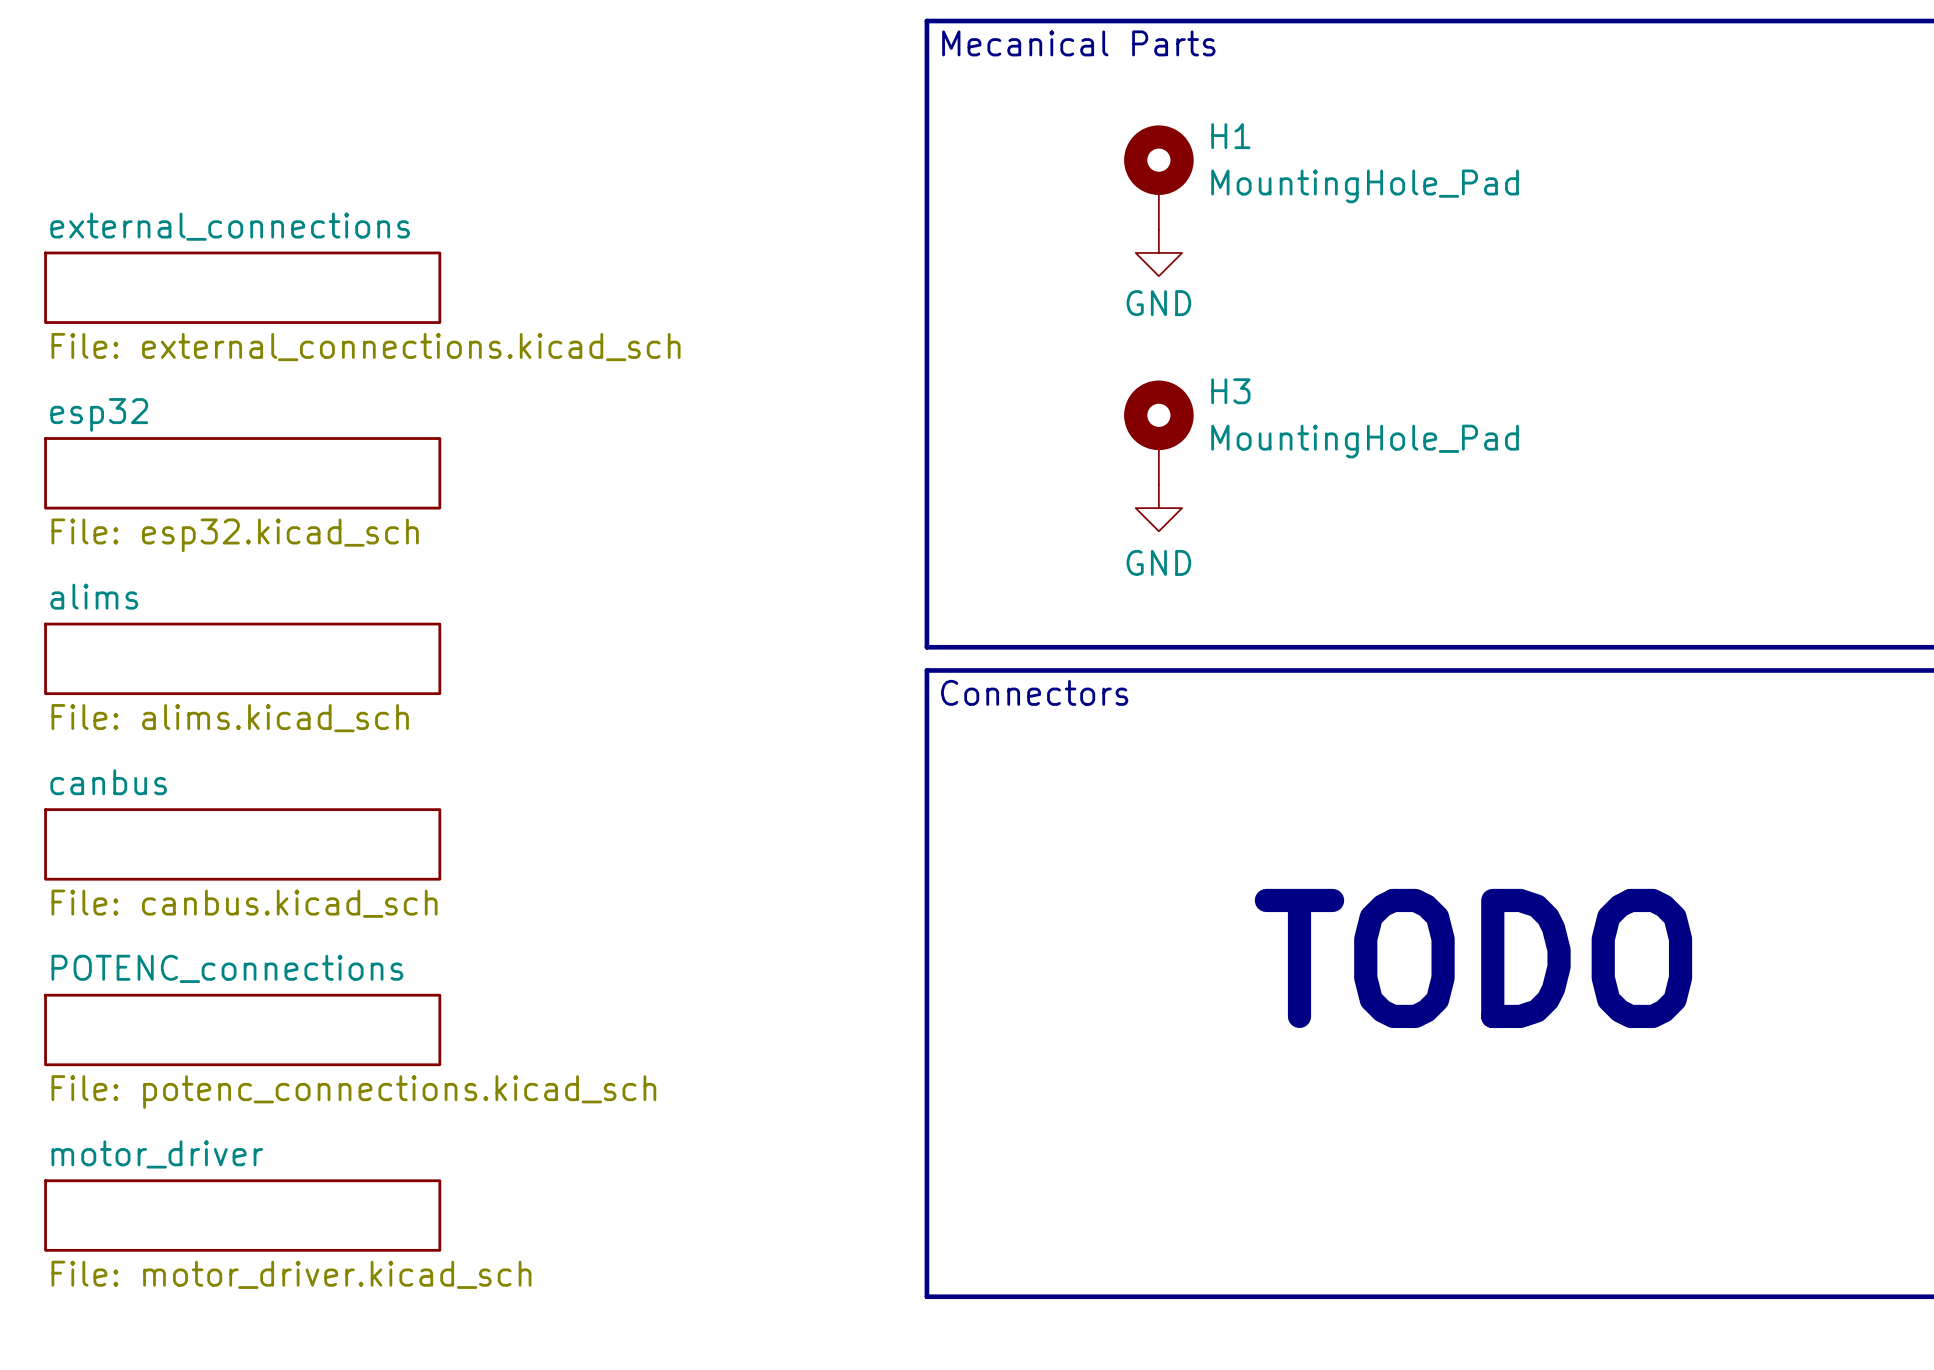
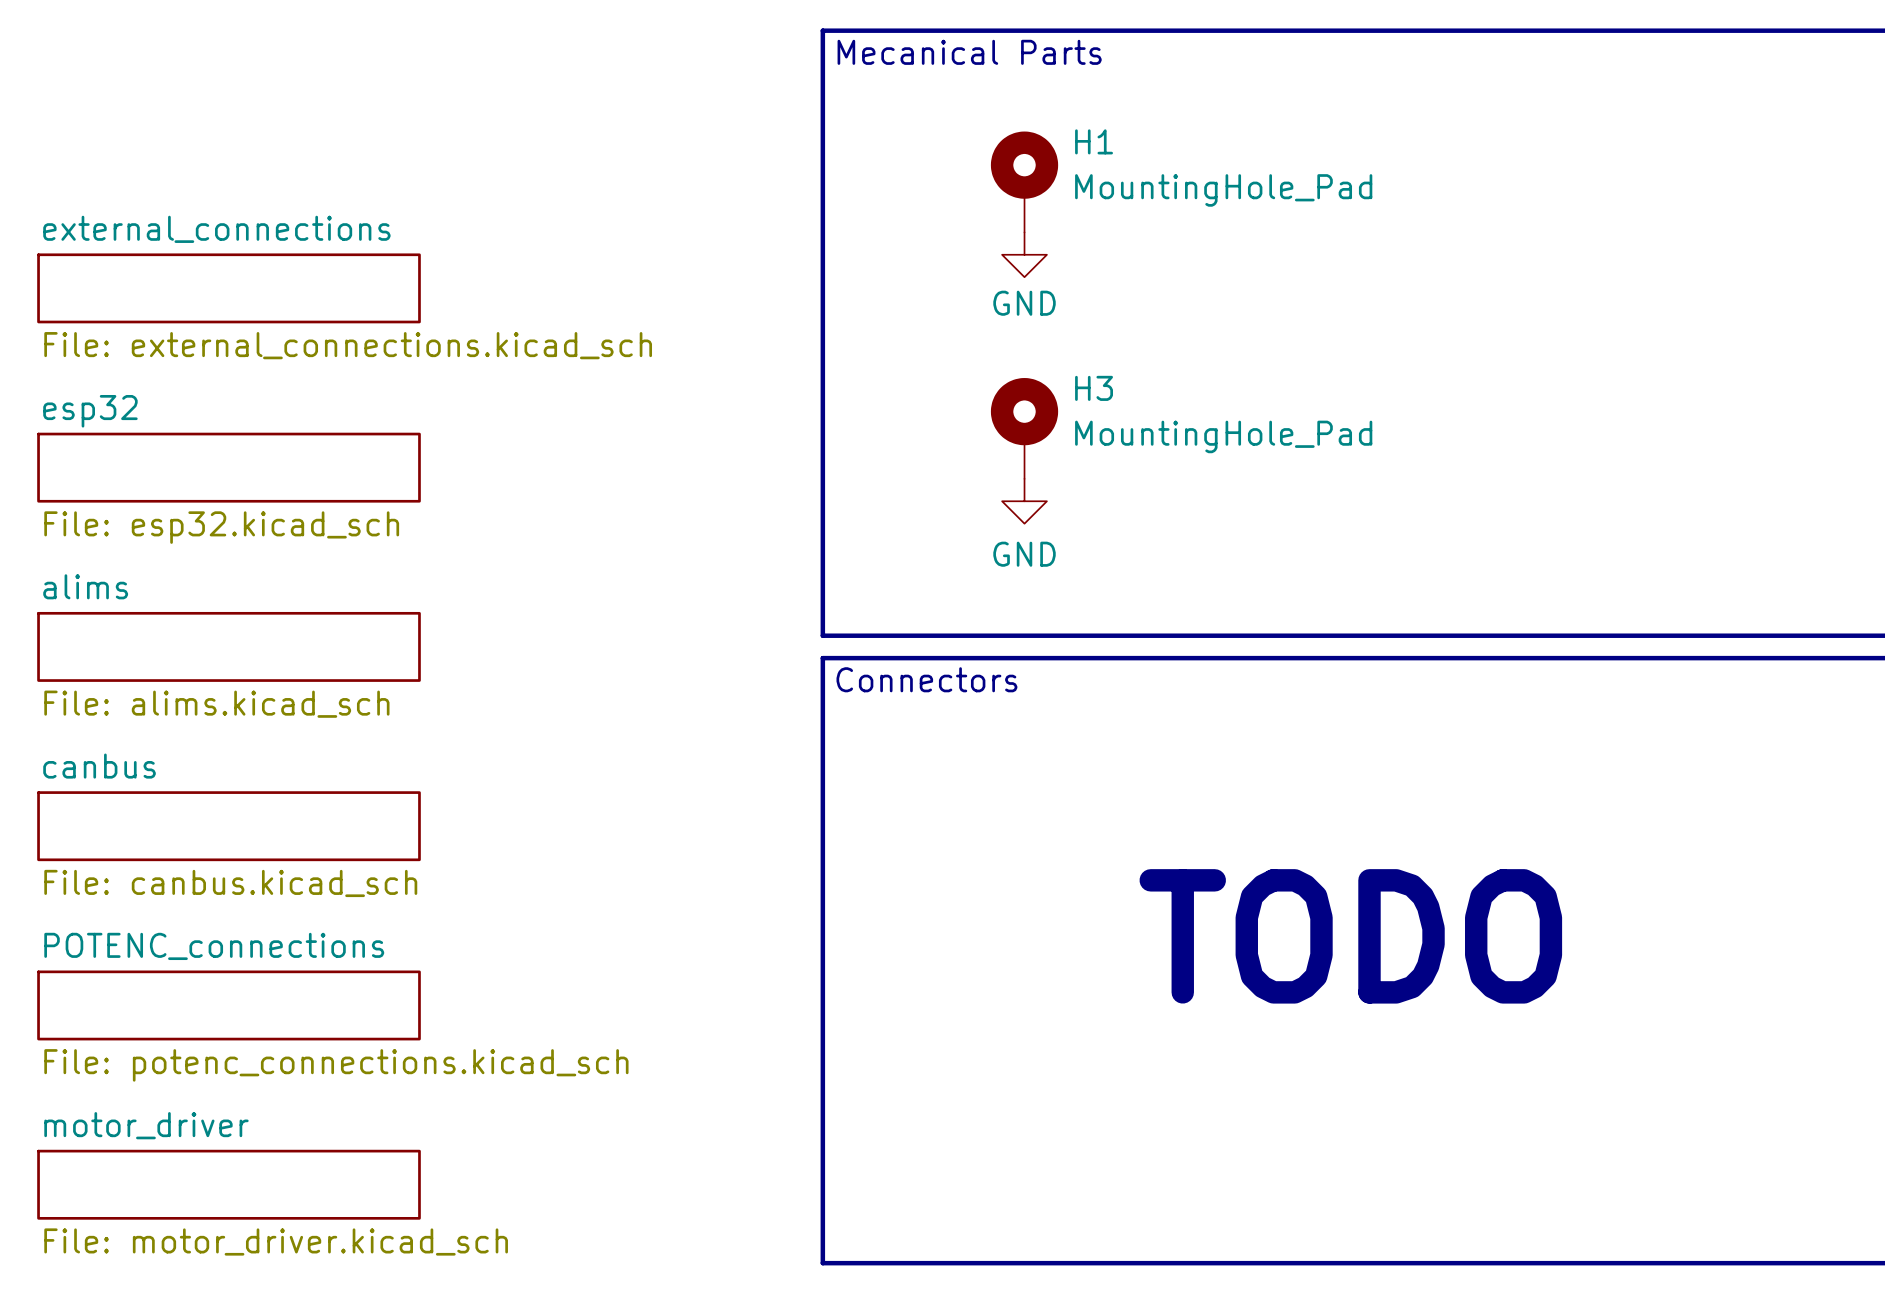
line: (926, 21) (926, 647) -> (890, 30) (822, 30) (822, 635) (890, 635)
text position: Mecanical Parts (1078, 43) -> Mecanical Parts (969, 52)
H1 position: (1158, 177) -> (1024, 181)
power symbol position: GND (1158, 252) -> GND (1024, 254)
H3 position: (1158, 432) -> (1024, 428)
power symbol position: GND (1158, 508) -> GND (1024, 501)
line: (926, 670) (926, 1296) -> (890, 658) (822, 658) (822, 1263) (890, 1263)
text position: Connectors (1034, 692) -> Connectors (926, 679)
text position: TODO (1473, 958) -> TODO (1350, 936)

